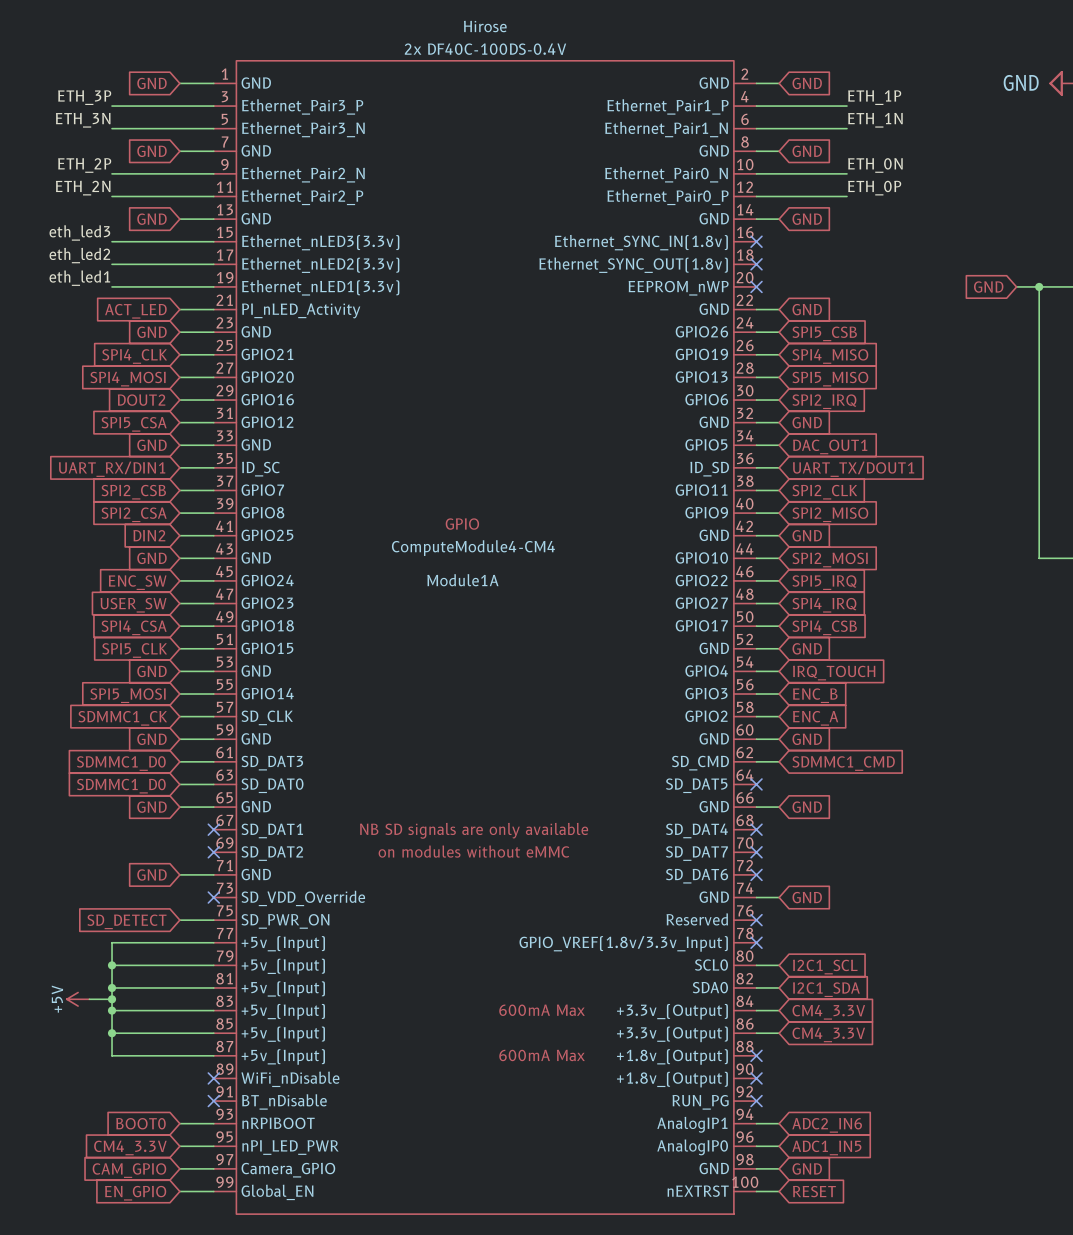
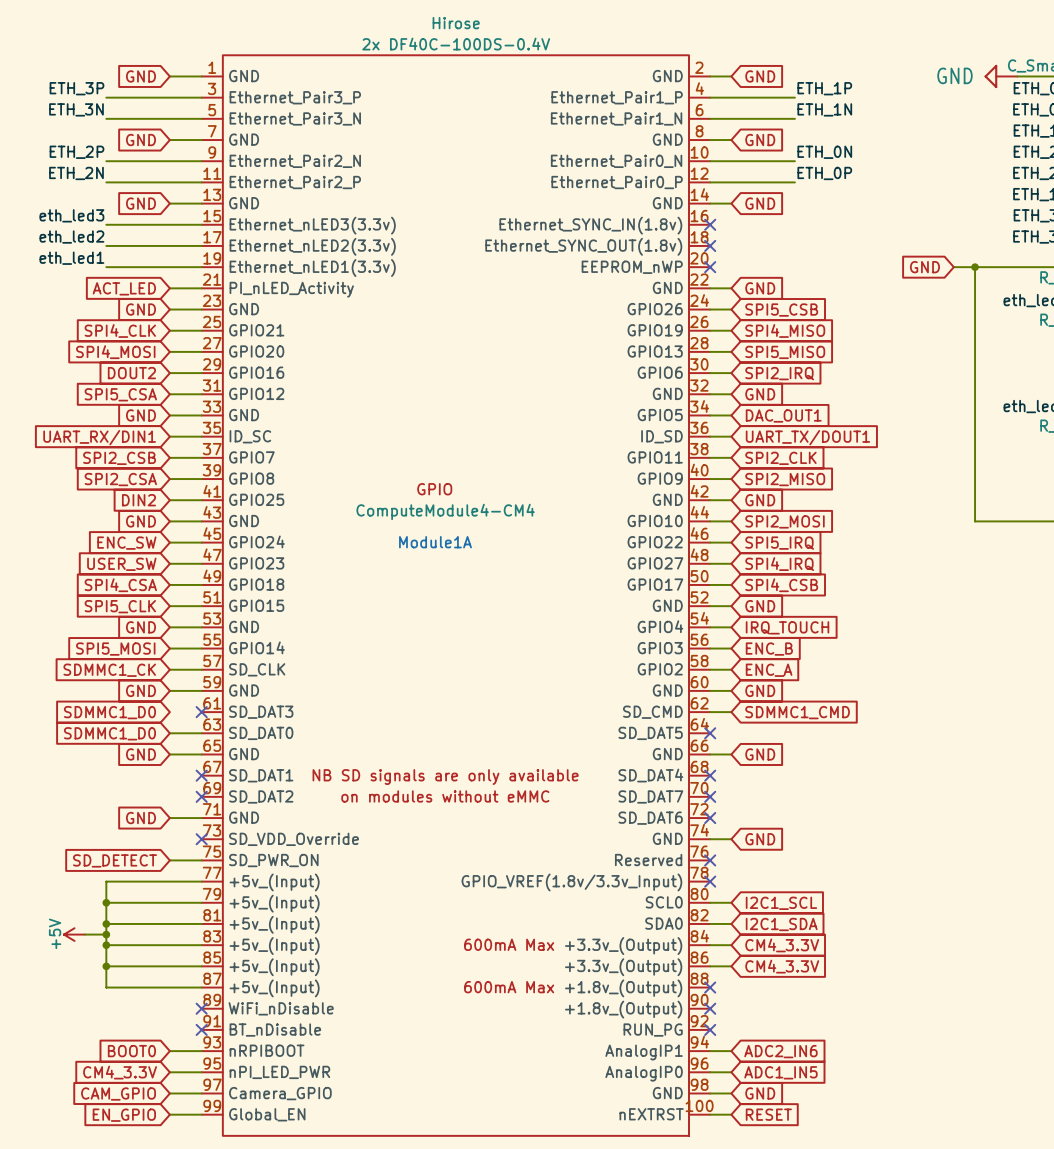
wire: (179, 761) (213, 761) -> none
no-connect mark: none -> (201, 712)

